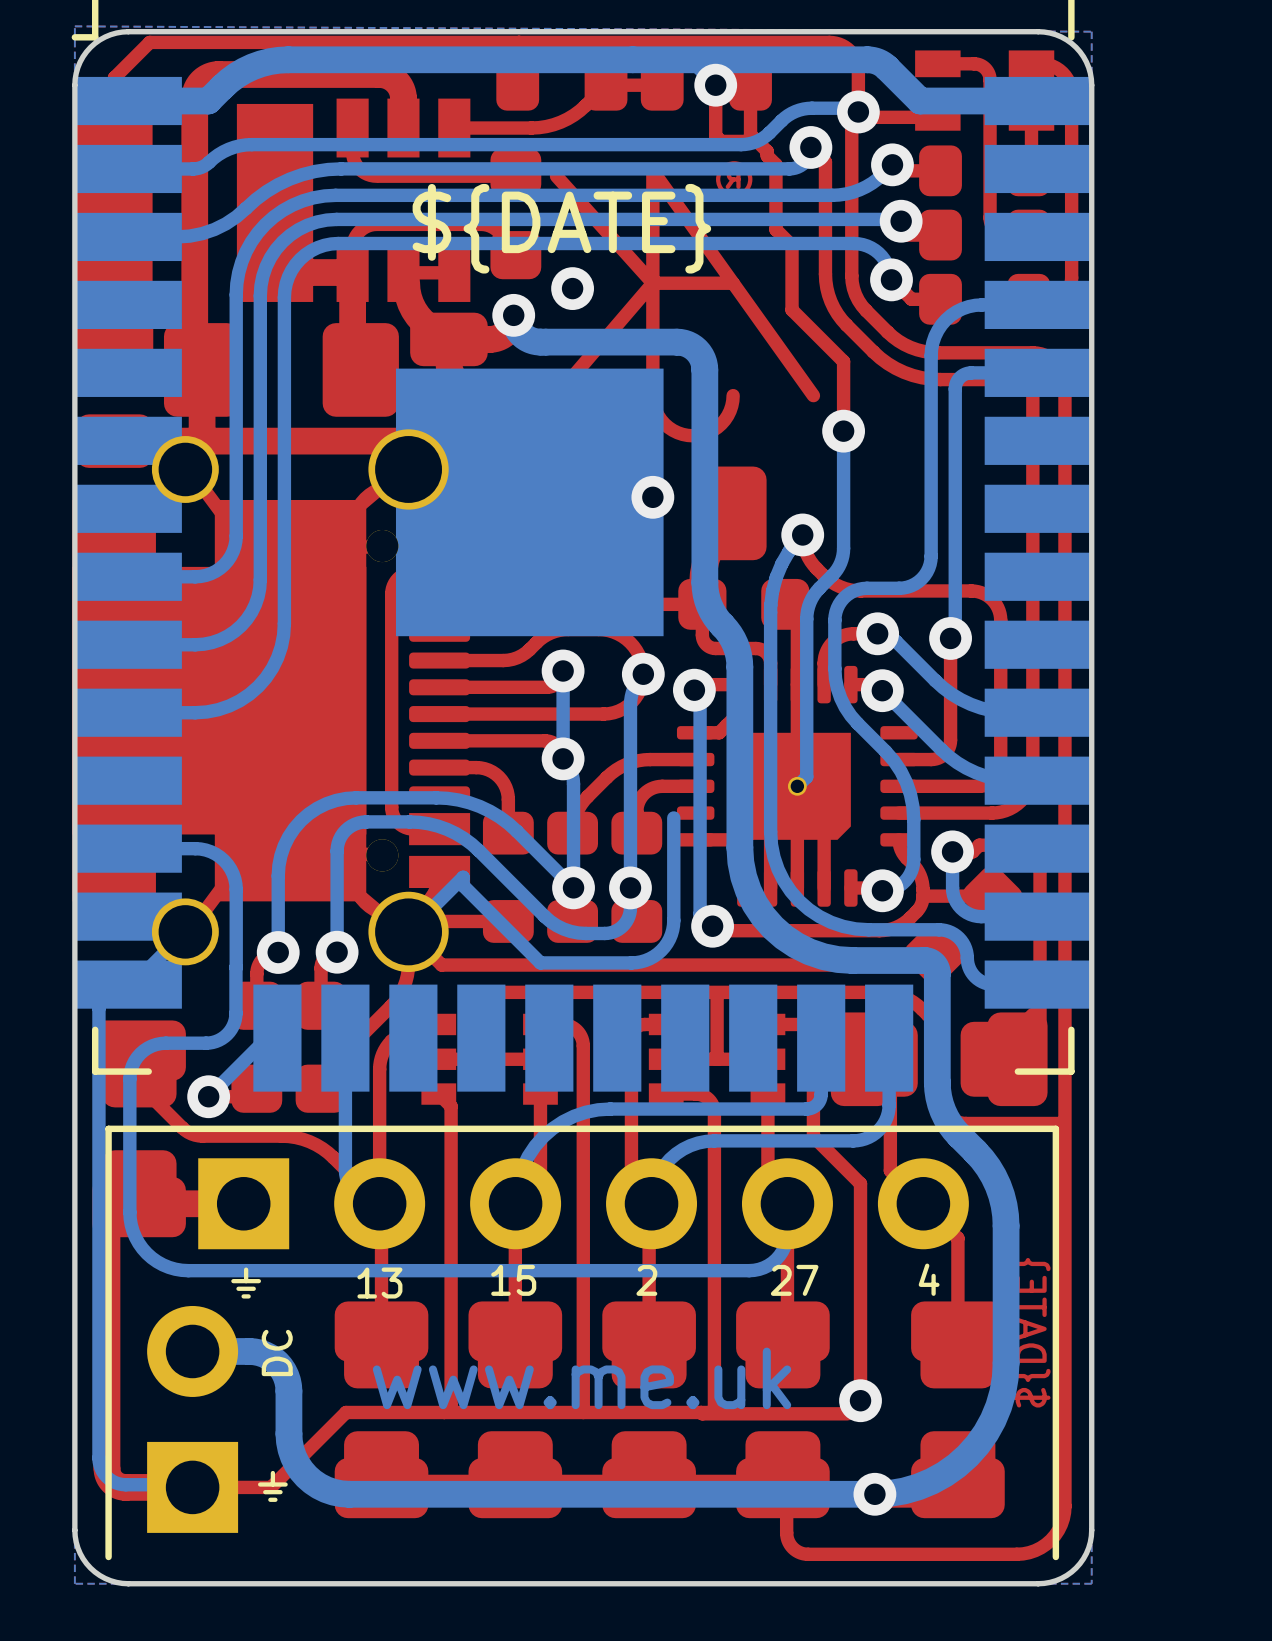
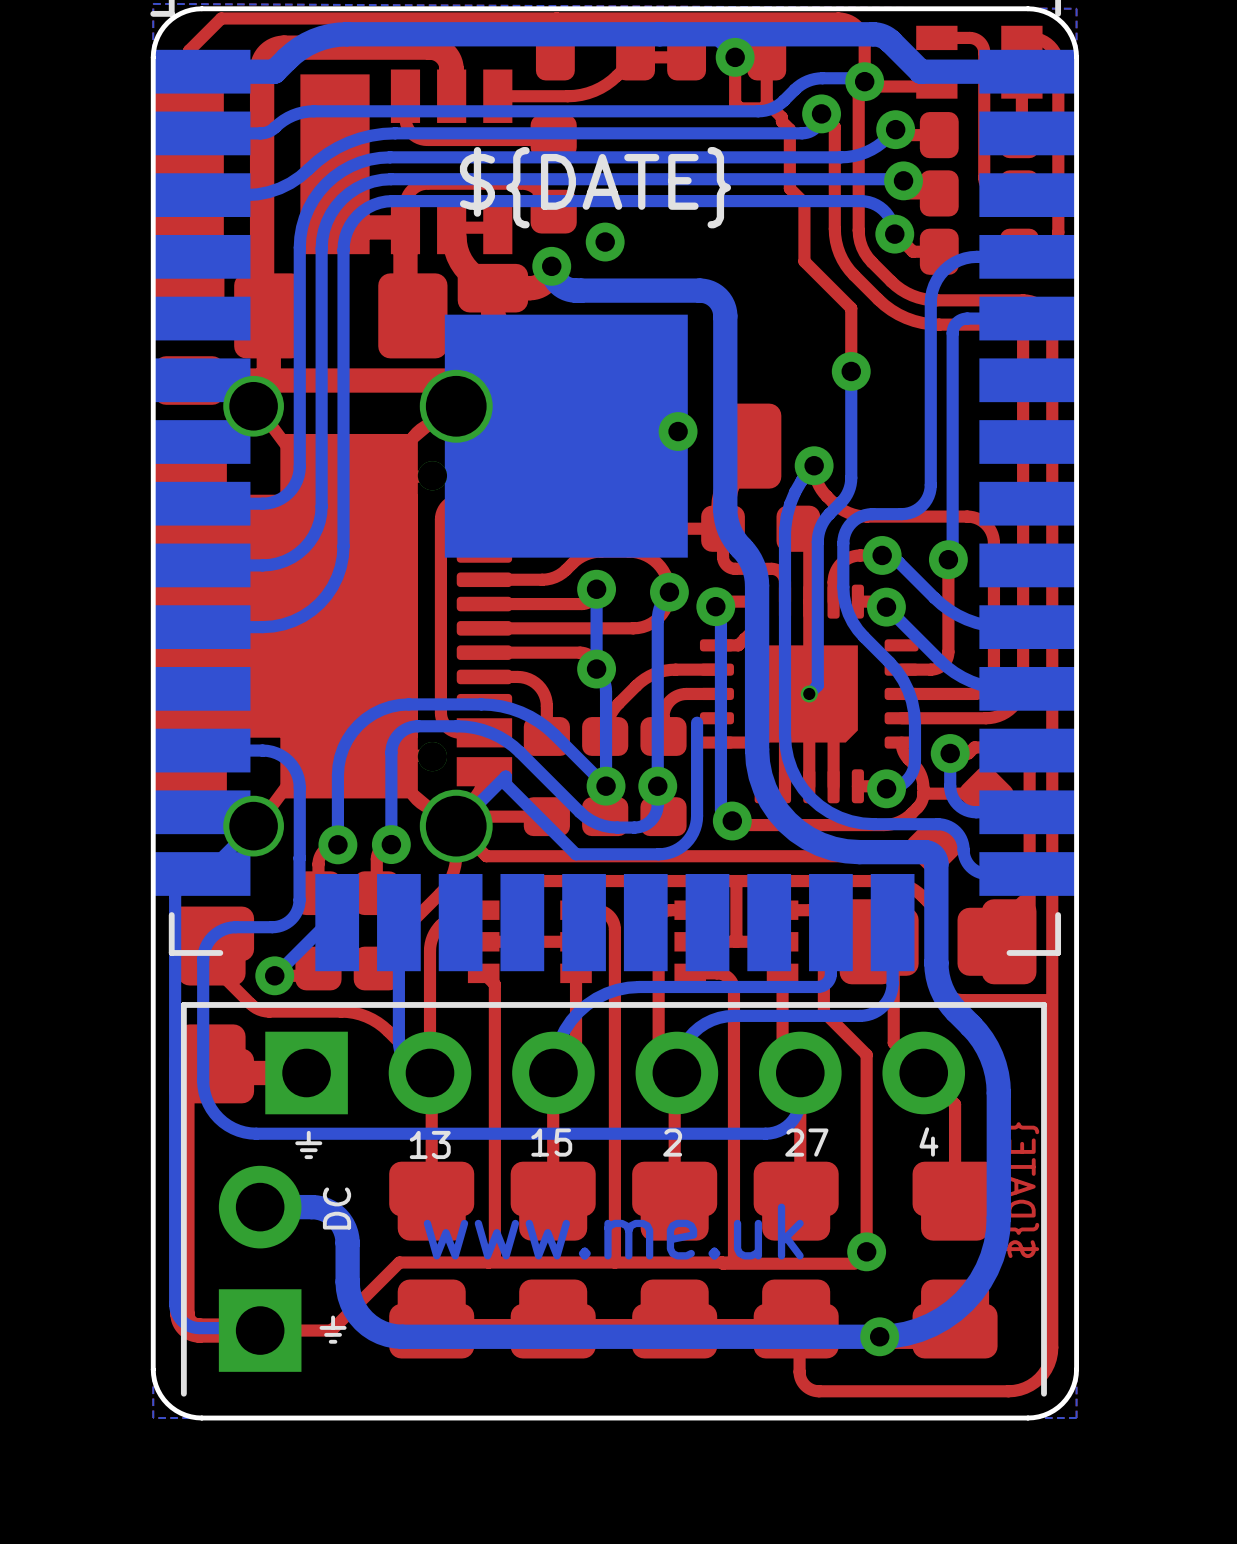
drawing: [549, 161, 821, 443] -> none

